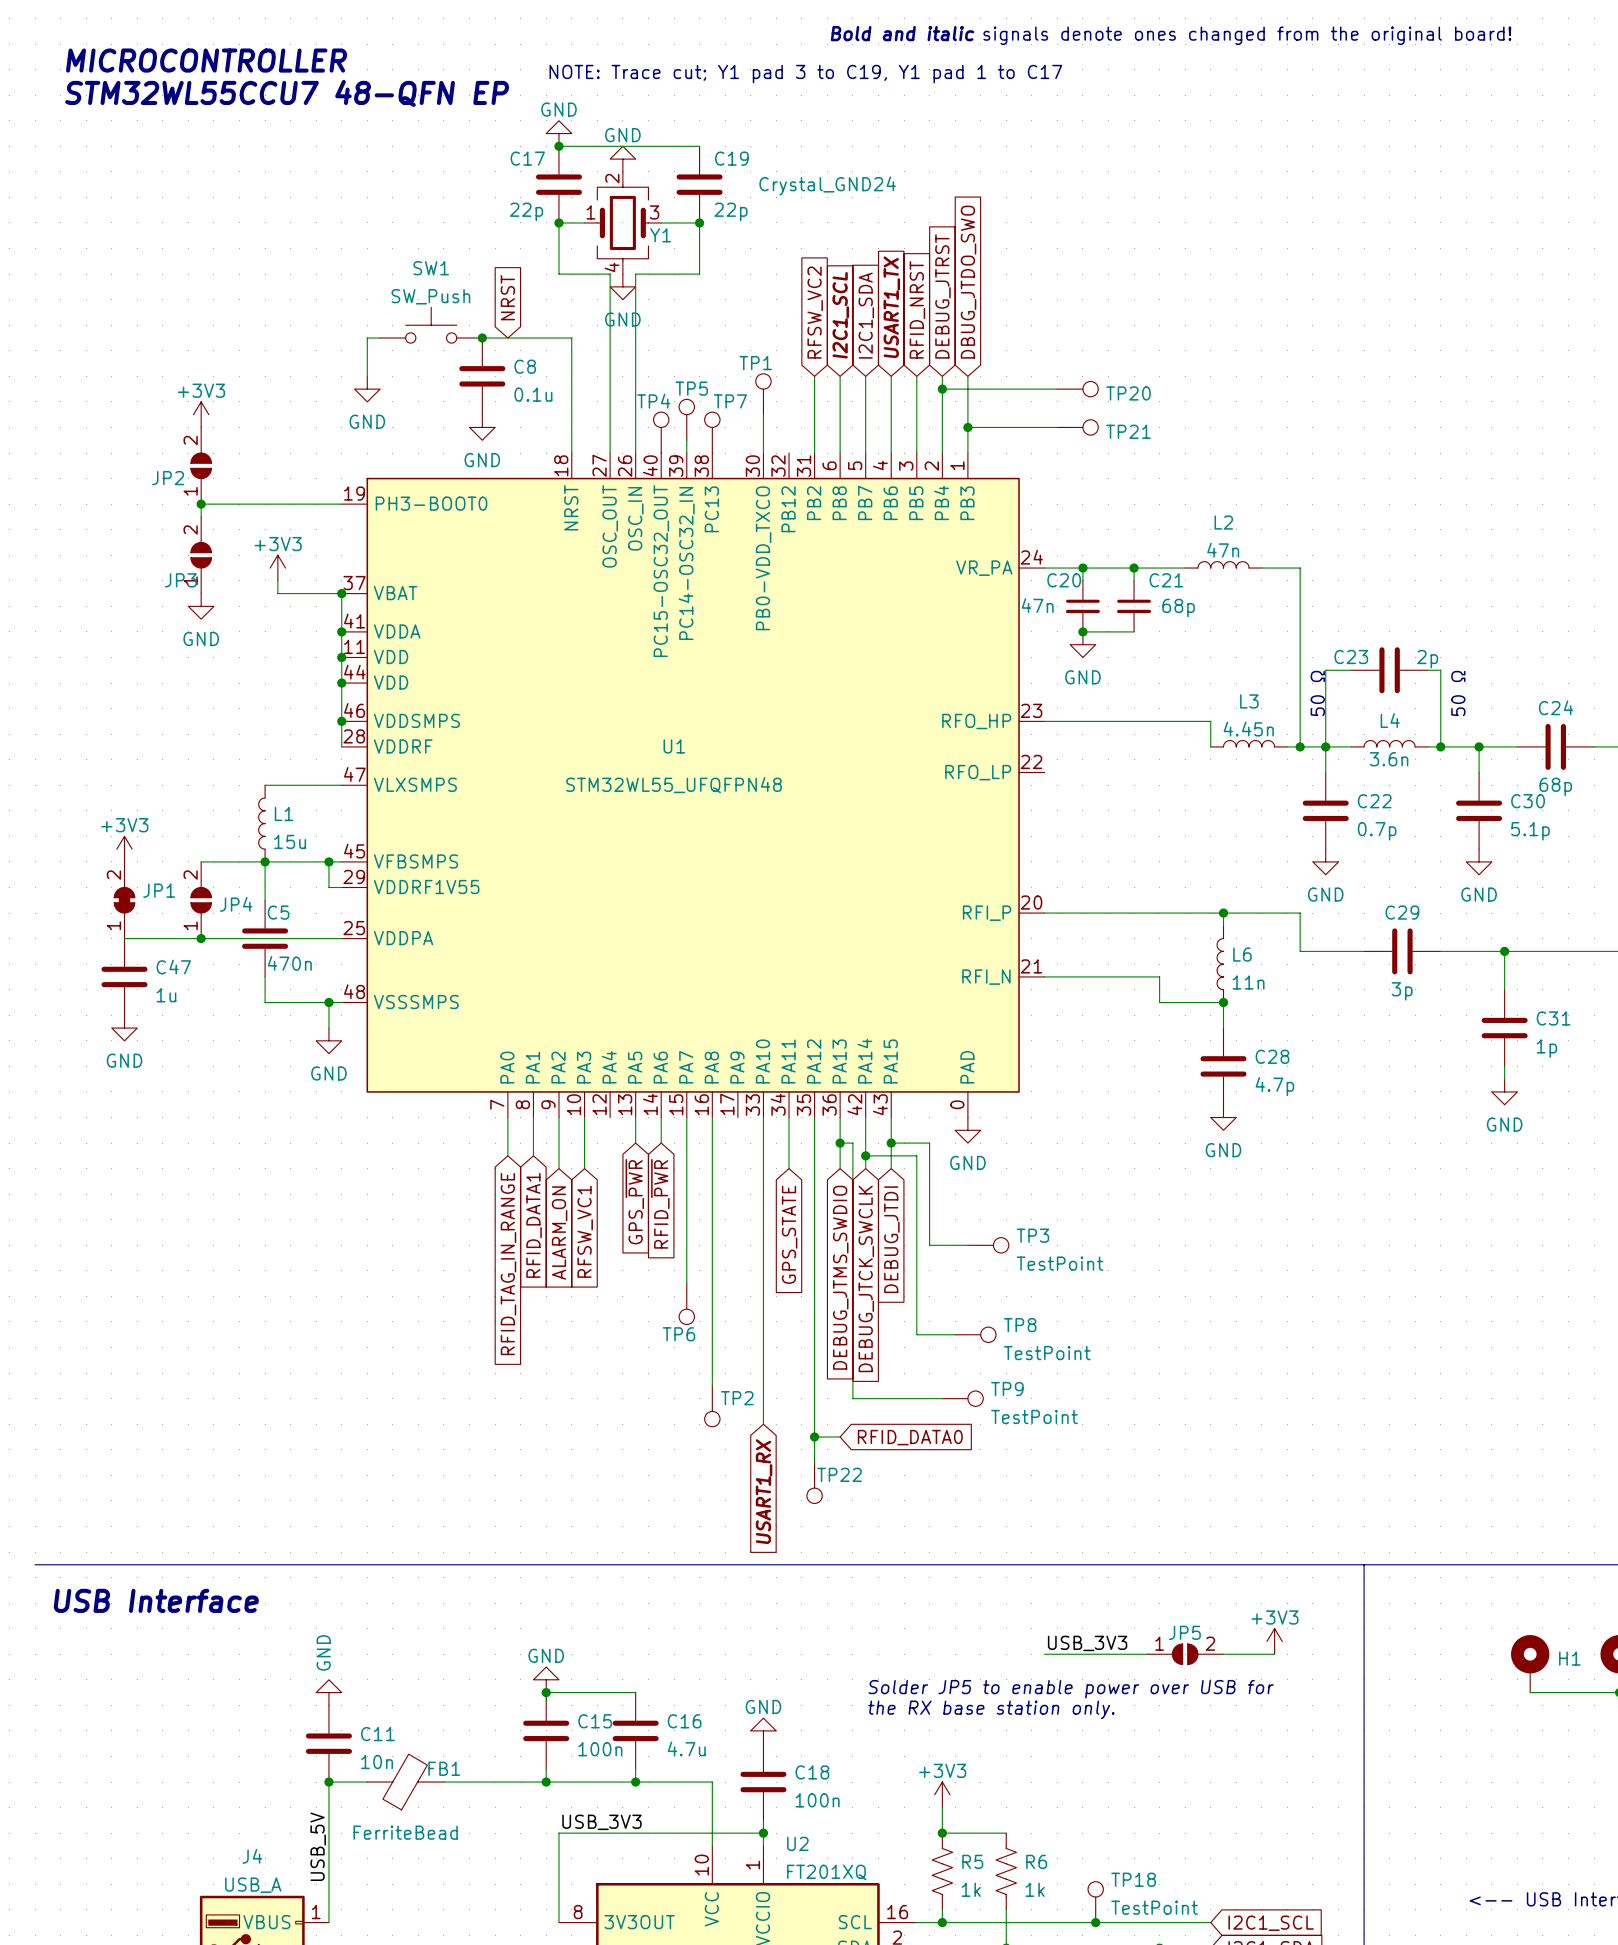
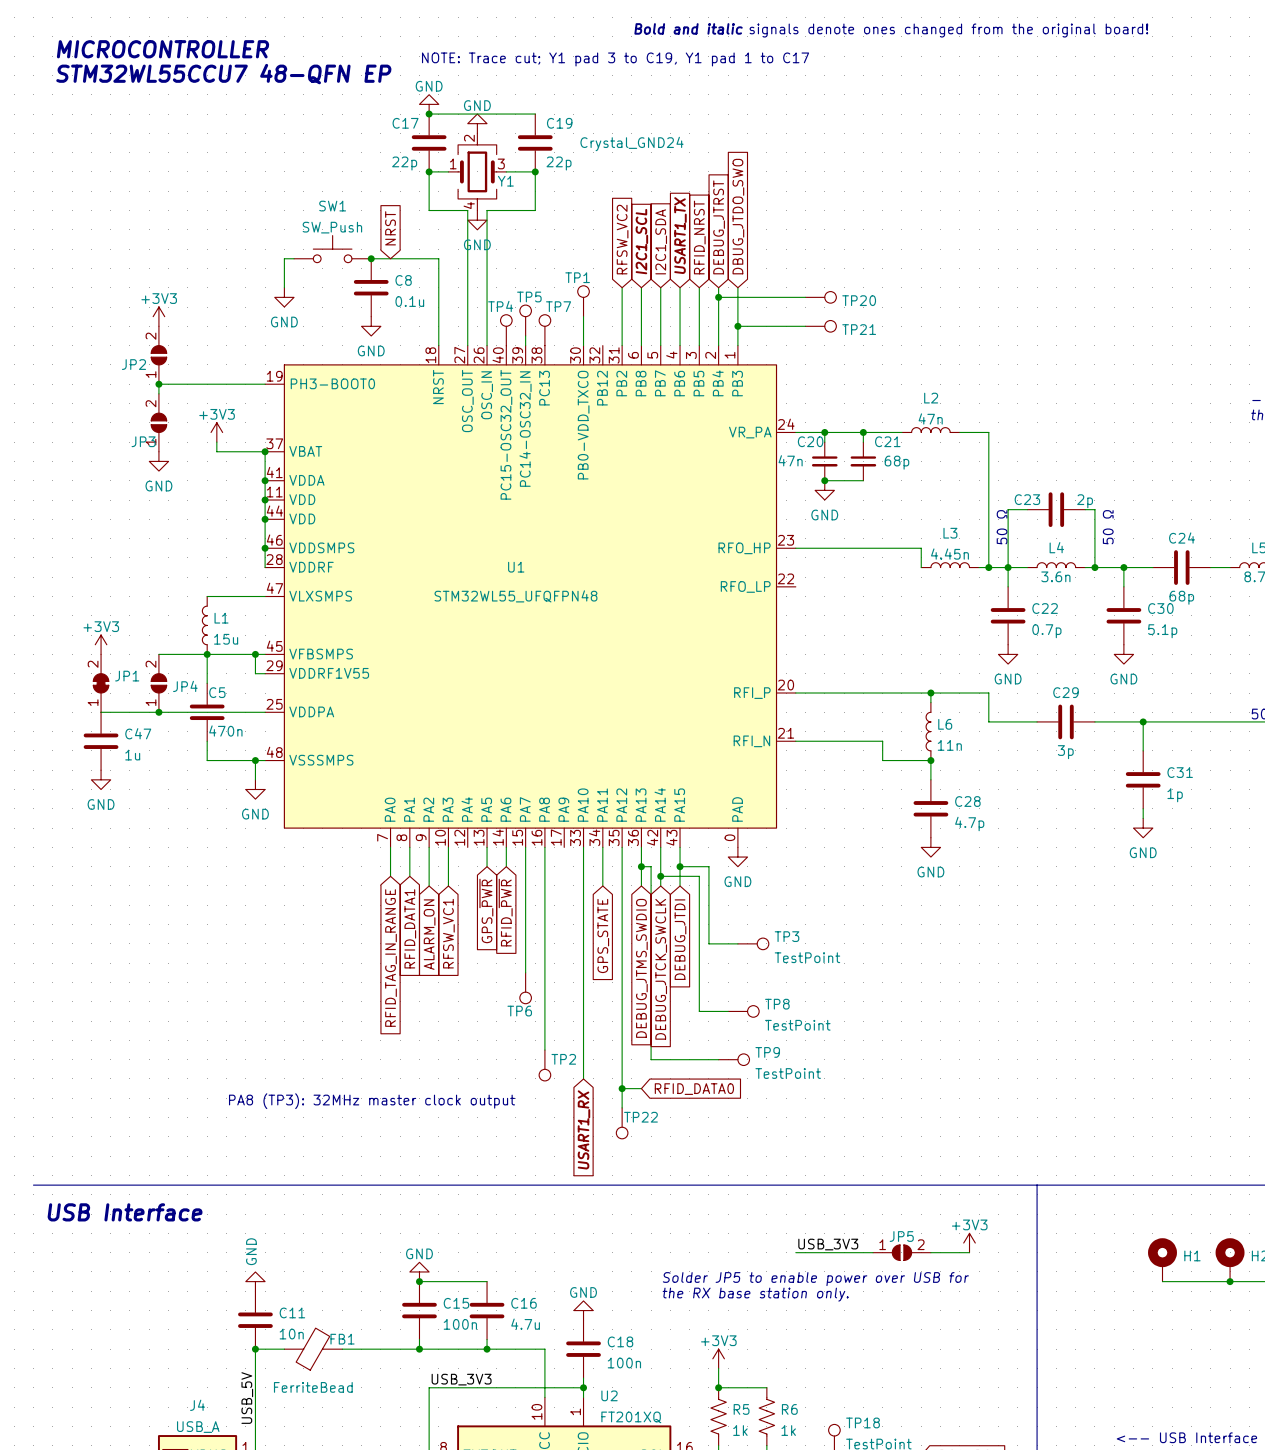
text: none -> PA8 (TP3): 32MHz master clock output (371, 1101)

